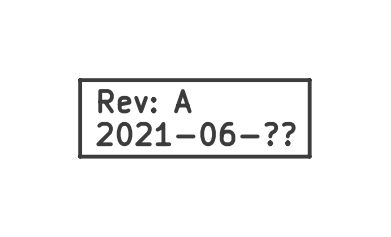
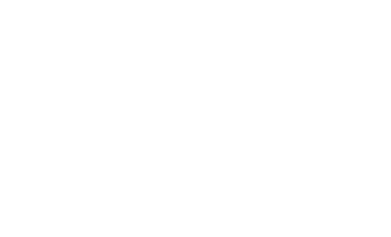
line: (80, 80) (309, 80) (309, 156) (80, 156) (80, 80) -> none
text: Rev: A (144, 101) -> none
text: 2021-06-?? (195, 134) -> none

